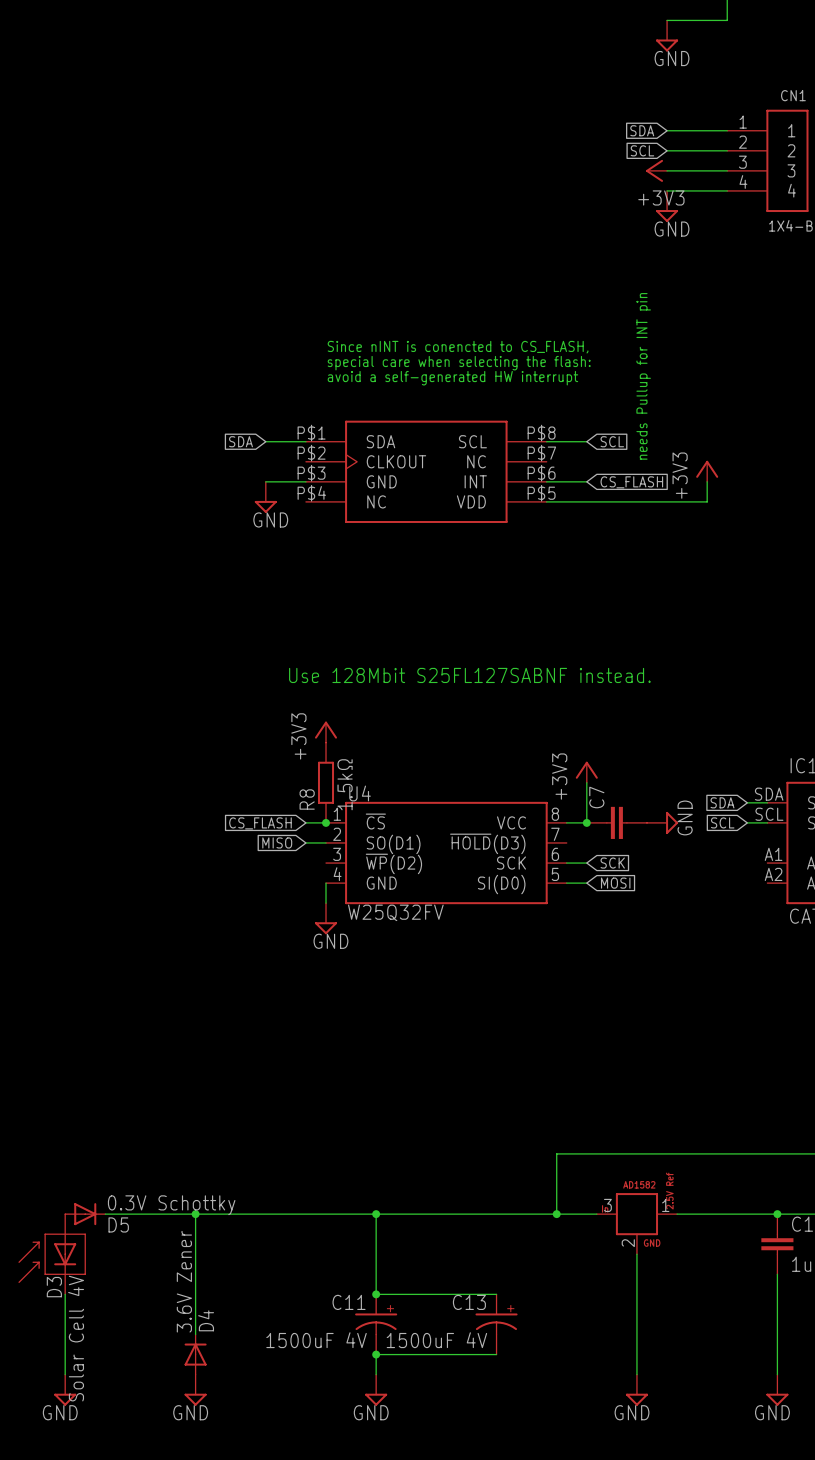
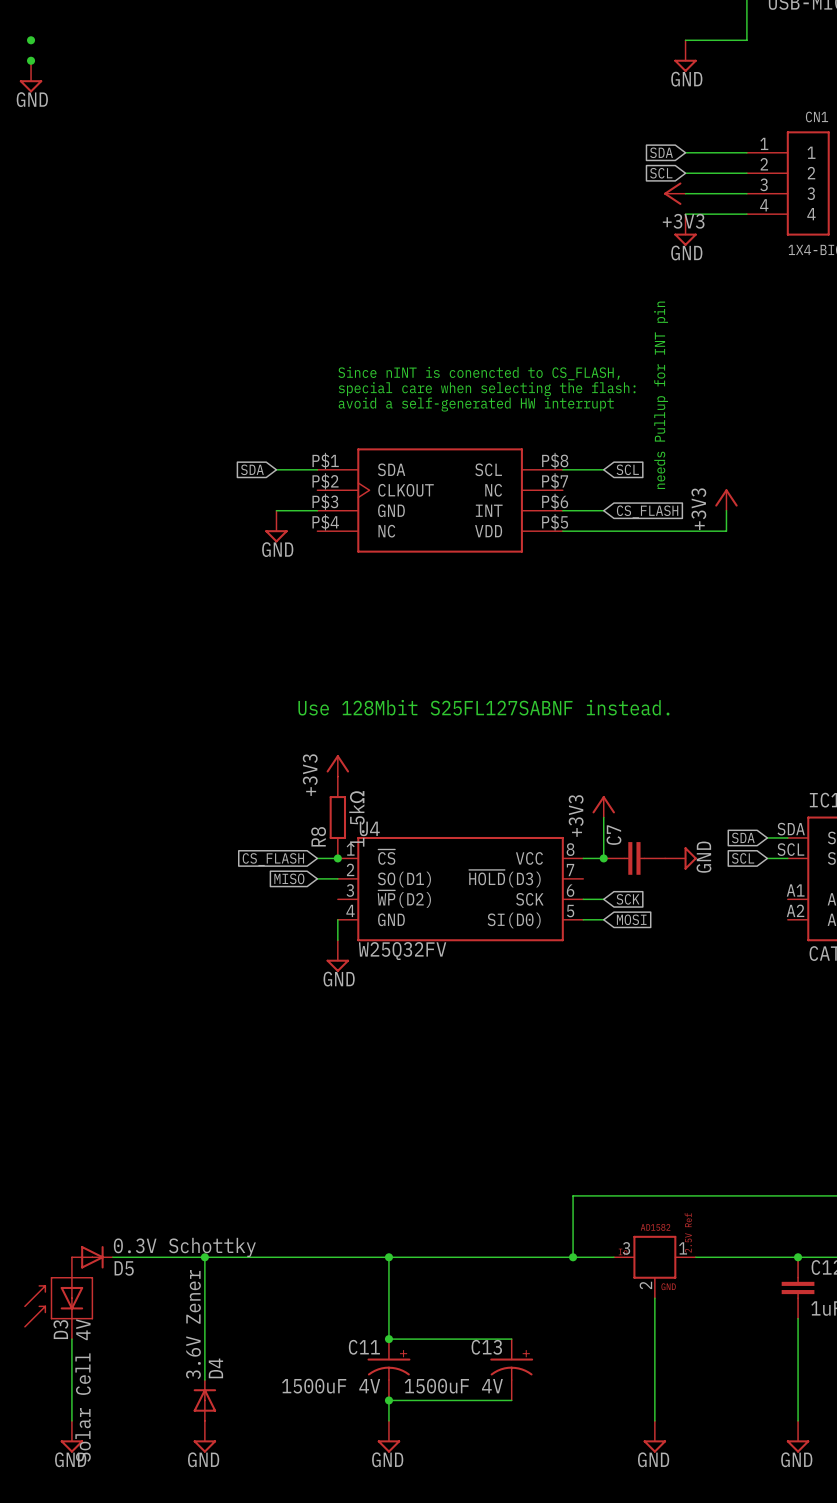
junction: none -> (31, 40)
junction: none -> (31, 60)
power symbol: none -> GND (31, 76)

